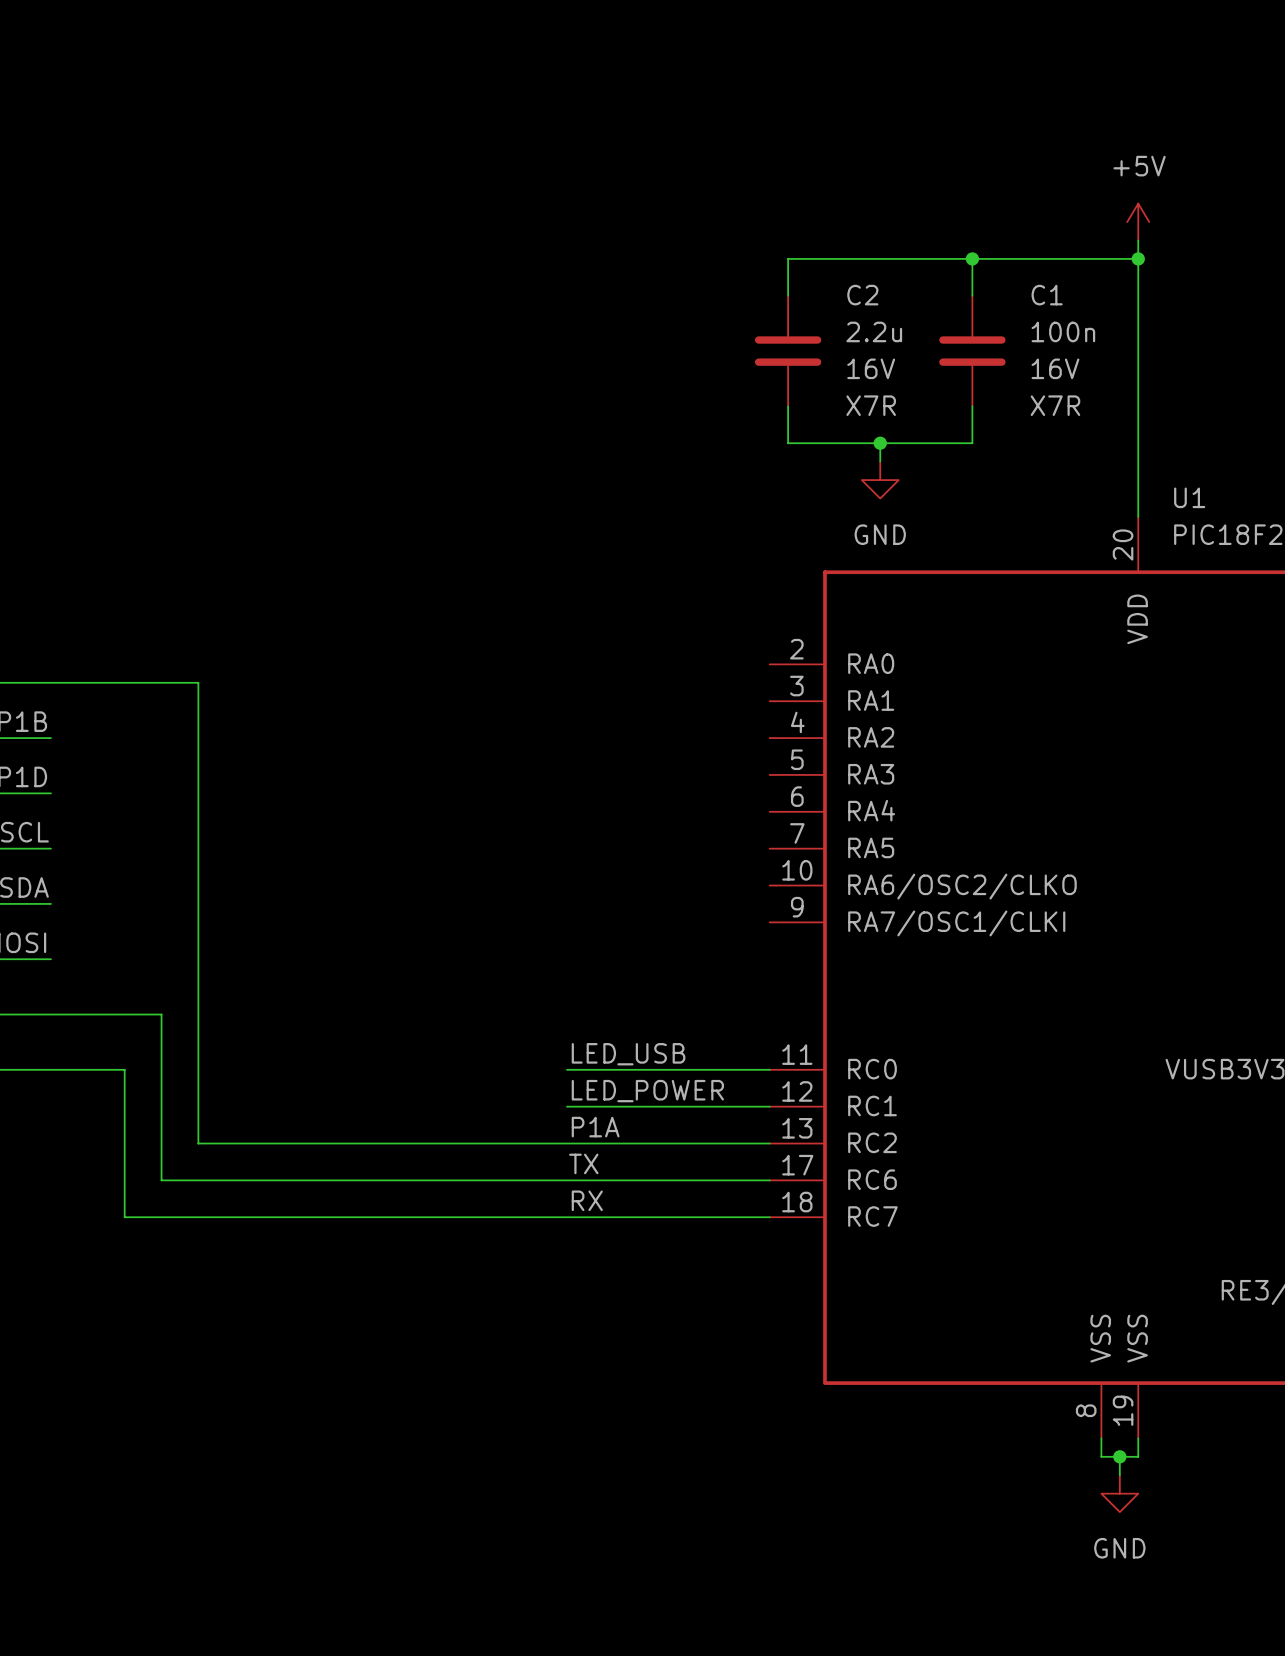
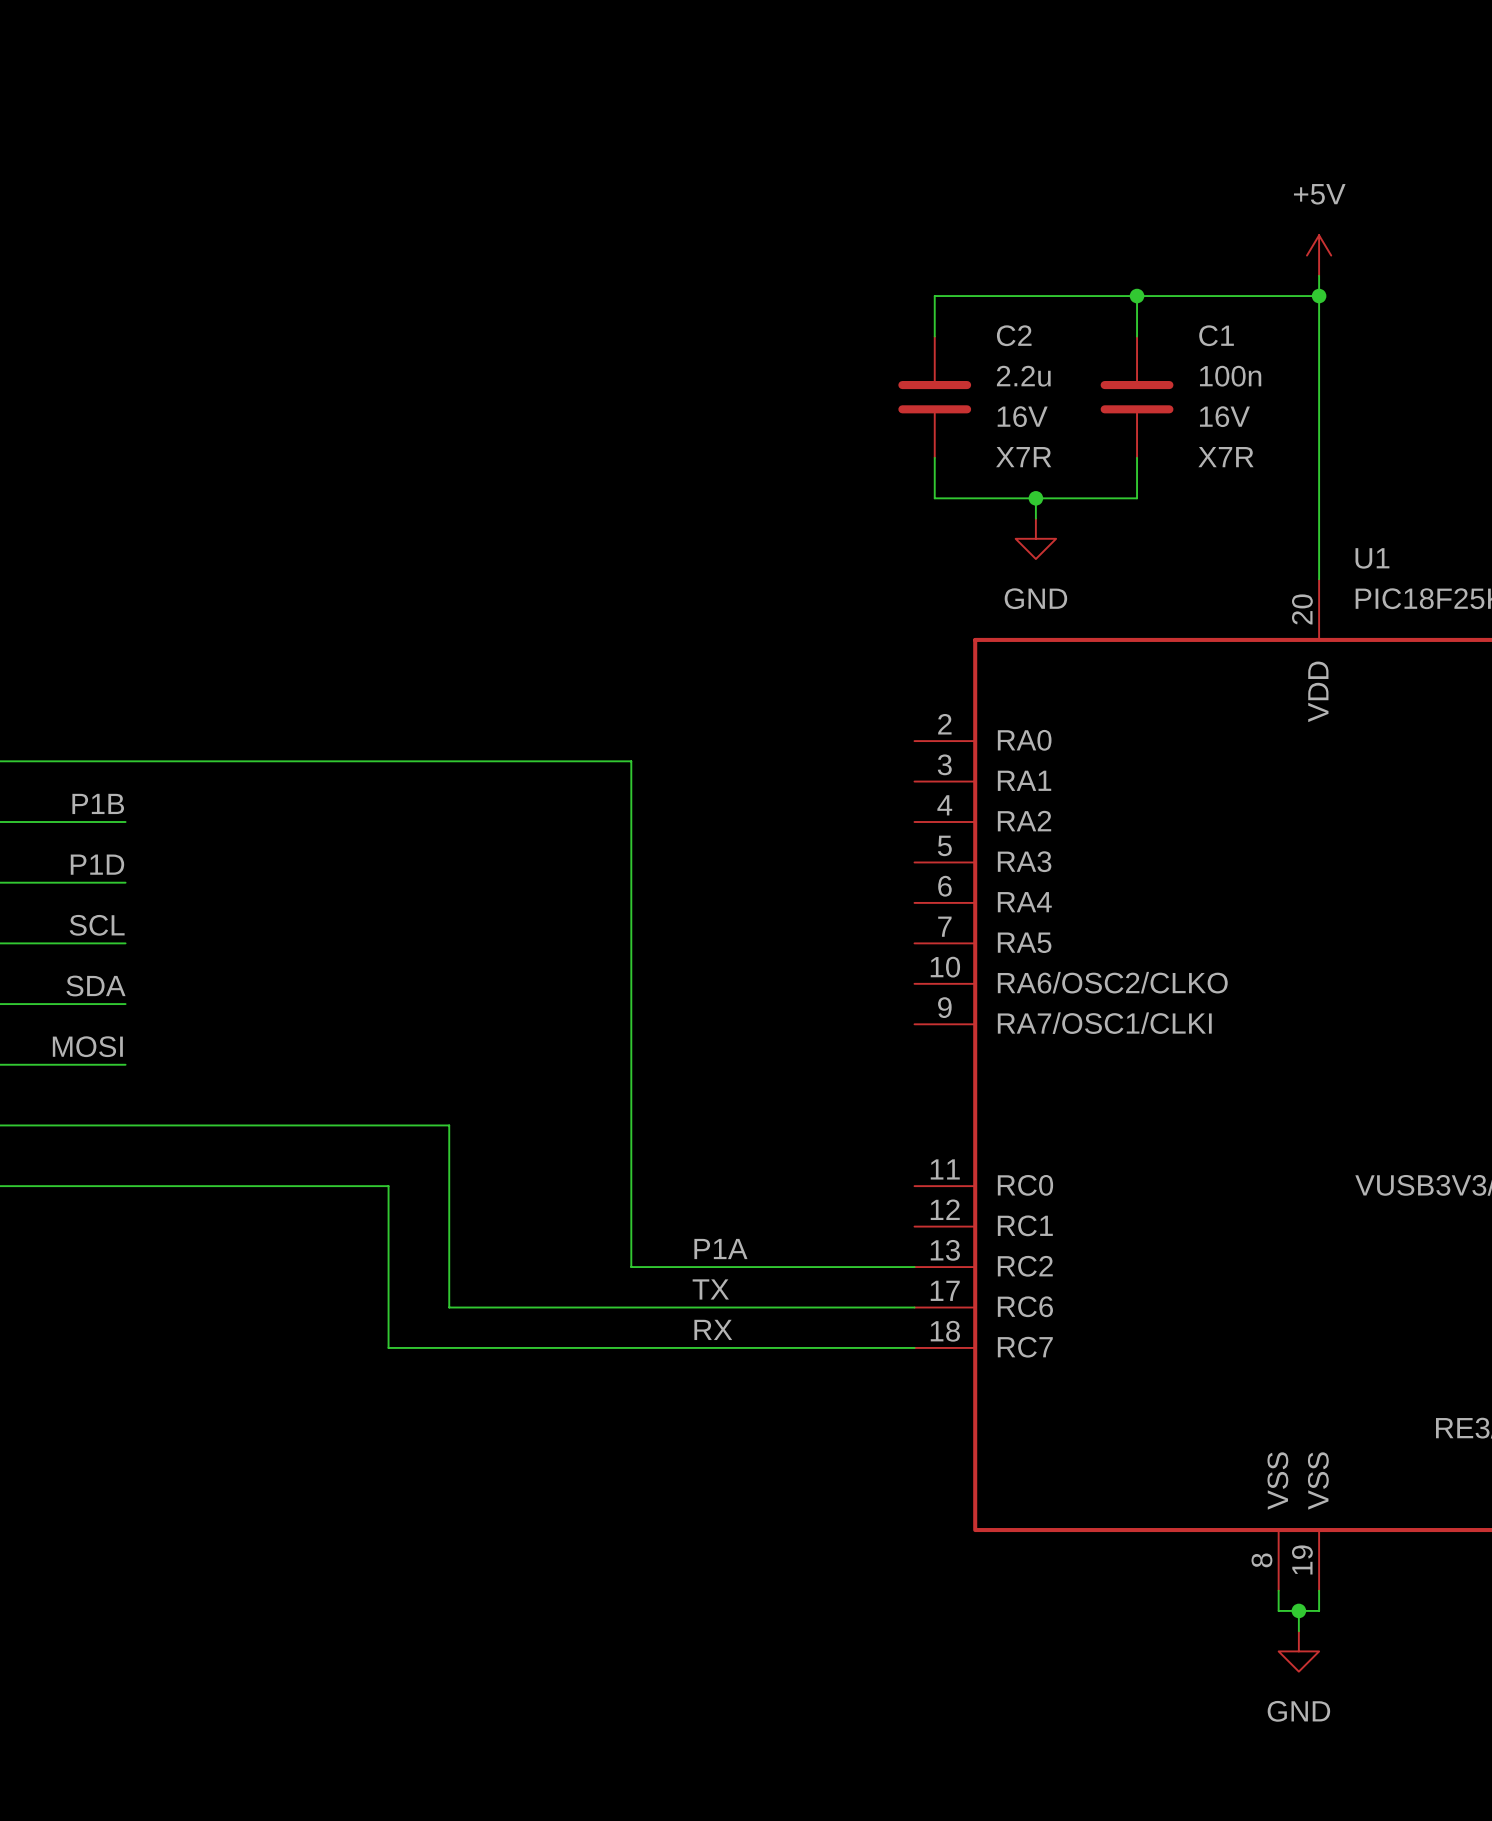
wire: (198, 682) (198, 1143) (511, 1143) -> (287, 761) (631, 761) (631, 1267)
wire: (161, 1014) (161, 1180) (345, 1180) -> (246, 1125) (449, 1125) (449, 1307)
label: LED_USB (628, 1054) -> none
wire: (124, 1069) (124, 1217) (290, 1217) -> (206, 1186) (388, 1186) (388, 1347)
wire: (566, 1069) (769, 1069) -> none
label: LED_POWER (647, 1091) -> none
wire: (566, 1106) (769, 1106) -> none

